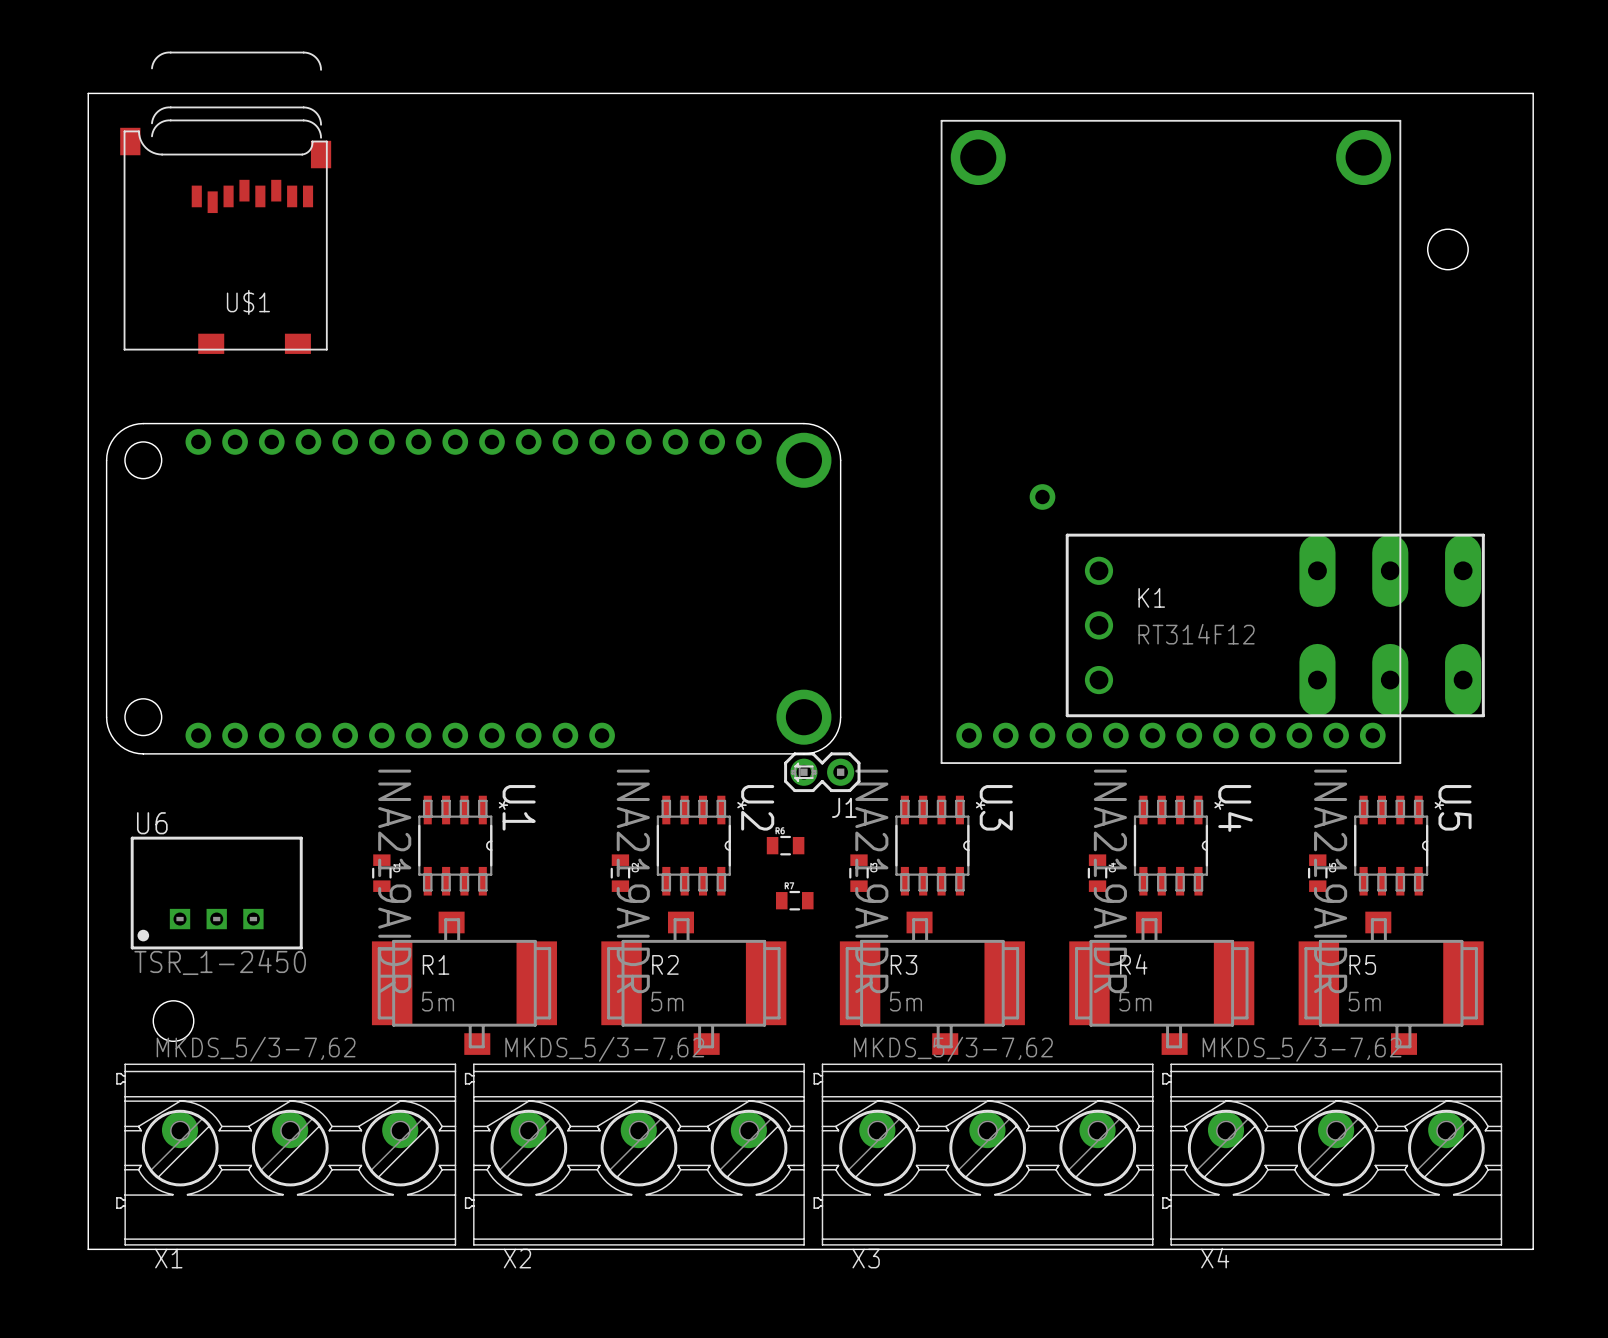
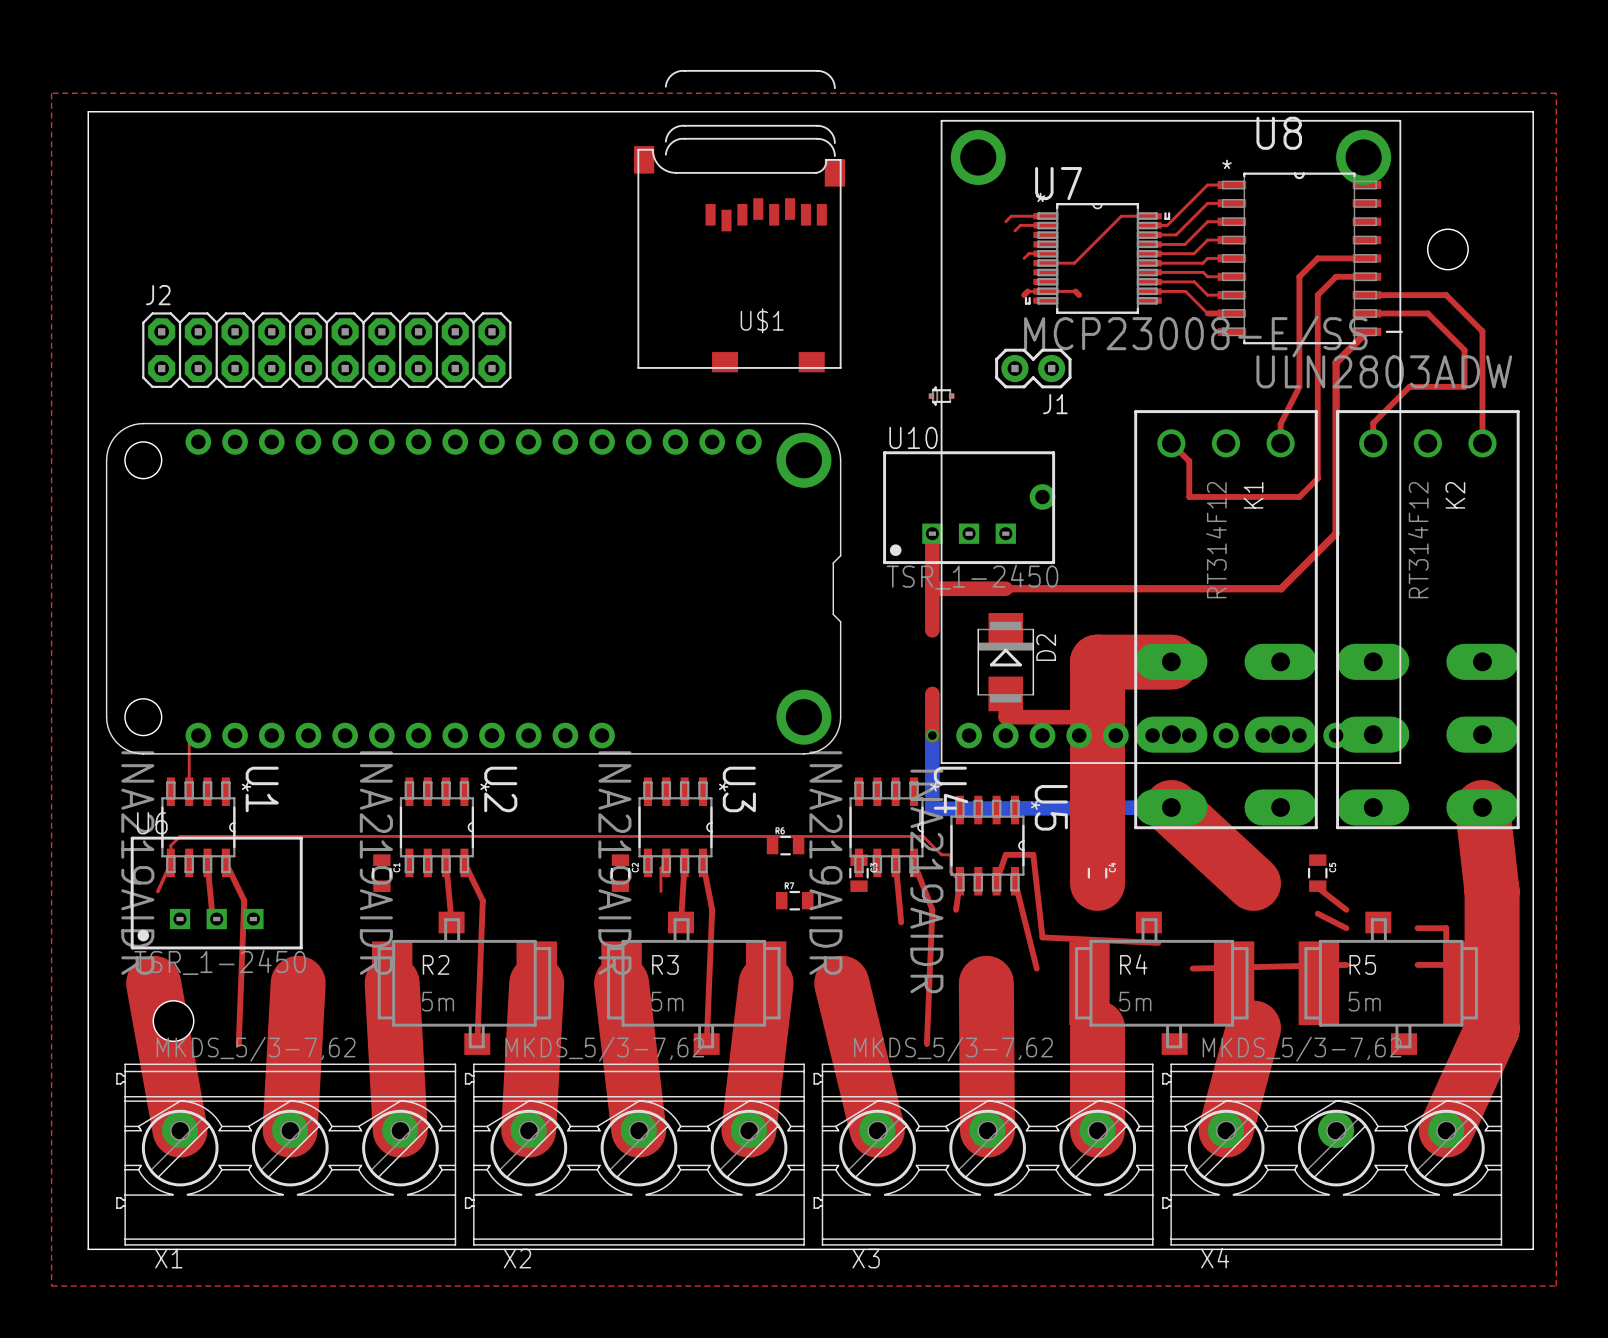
top zone outline: none -> (51, 93) (51, 1286) (1556, 1286) (1556, 93) (51, 93)
board edge: (88, 111) (88, 93) (1533, 93) (1533, 111) -> (88, 111) (1533, 111)
top track: none -> (1231, 185) (1207, 185) (1167, 225) (1149, 225)
U$1 position: (225, 202) -> (739, 221)
top track: none -> (1231, 203) (1207, 203) (1176, 234) (1149, 234)
top track: none -> (1045, 216) (1011, 216) (1005, 221)
top track: none -> (1149, 216) (1121, 216) (1074, 263) (1045, 263)
top track: none -> (1231, 221) (1207, 221) (1184, 244) (1149, 244)
top track: none -> (1045, 225) (1020, 225) (1014, 230)
top track: none -> (1231, 240) (1207, 240) (1194, 253) (1149, 253)
top track: none -> (1045, 253) (1028, 253) (1024, 258)
U7: none -> MCP23008-E/SS (1097, 258)
top track: none -> (1231, 258) (1207, 258) (1202, 263) (1149, 263)
U8: none -> ULN2803ADW (1310, 258)
top track: none -> (1366, 258) (1317, 258) (1299, 276) (1299, 386) (1280, 424) (1280, 443)
top track: none -> (1149, 272) (1203, 272) (1207, 276) (1231, 276)
top track: none -> (1366, 276) (1336, 276) (1317, 295) (1317, 478) (1299, 496) (1189, 496) (1189, 461) (1171, 443)
top track: none -> (1149, 281) (1194, 281) (1207, 295) (1231, 295)
top track: none -> (1149, 291) (1185, 291) (1207, 313) (1231, 313)
top track: none -> (1024, 295) (1027, 291) (1075, 291) (1079, 295)
top track: none -> (1366, 295) (1446, 295) (1482, 331) (1482, 443)
top track: none -> (1366, 313) (1427, 313) (1464, 350) (1464, 386) (1409, 386) (1373, 423) (1373, 443)
top track: none -> (1366, 331) (1336, 362) (1336, 533) (1281, 588) (932, 588)
J2: none -> (326, 350)
part: none -> (941, 396)
part footprint: [106, 423, 841, 754] -> [106, 423, 841, 754]
U10: none -> TSR_1-2450 (969, 507)
top track: none -> (932, 533) (932, 630)
K2: none -> RT314F12 (1427, 619)
K1 rotation: 0° (1275, 625) -> 90° clockwise (1226, 619)
D2: none -> (1005, 662)
top track: none -> (1171, 662) (1097, 662) (1097, 883)
top track: none -> (932, 693) (932, 735)
top track: none -> (1005, 693) (1005, 717) (1097, 717)
top track: none -> (198, 735) (189, 744) (189, 791)
bottom track: none -> (932, 735) (932, 808) (1171, 807)
via: none -> (932, 735)
part: (803, 772) -> none
J1 position: (822, 772) -> (1033, 368)
top track: none -> (1171, 807) (1253, 883)
top track: none -> (1482, 807) (1492, 891) (1492, 1029) (1446, 1130)
U1 position: (455, 845) -> (198, 827)
U2 position: (693, 845) -> (436, 827)
U3 position: (932, 845) -> (675, 827)
U4 position: (1170, 845) -> (886, 827)
U5 position: (1391, 845) -> (987, 845)
top track: none -> (207, 862) (213, 922)
top track: none -> (225, 862) (244, 900) (238, 1044)
top track: none -> (446, 862) (451, 922)
top track: none -> (464, 862) (482, 900) (477, 1044)
top track: none -> (666, 862) (660, 868) (660, 891)
top track: none -> (684, 862) (680, 922)
top track: none -> (703, 862) (712, 909) (706, 1044)
top track: none -> (895, 862) (901, 922)
top track: none -> (914, 862) (932, 909) (926, 1044)
top track: none -> (996, 881) (1005, 854) (1033, 854) (1042, 937) (1158, 942)
top track: none -> (1014, 881) (1036, 968)
top track: none -> (1317, 887) (1346, 909)
top track: none -> (157, 891) (170, 862) (170, 845) (180, 836) (923, 836) (941, 854) (950, 854) (950, 872) (959, 881) (956, 909)
top track: none -> (1317, 913) (1346, 928)
top track: none -> (1417, 928) (1446, 928) (1446, 964) (1417, 964)
R1 name: R1 (436, 964) -> R2 (436, 964)
R2 name: R2 (665, 964) -> R3 (665, 964)
top track: none -> (1346, 964) (1192, 968)
top track: none -> (153, 983) (180, 1130)
top track: none -> (298, 983) (290, 1130)
top track: none -> (392, 983) (400, 1130)
top track: none -> (536, 983) (528, 1130)
top track: none -> (621, 983) (638, 1130)
top track: none -> (766, 983) (748, 1130)
top track: none -> (841, 983) (877, 1130)
R3: 5m (932, 983) -> none
top track: none -> (986, 983) (987, 1130)
top track: none -> (1097, 1028) (1097, 1130)
top track: none -> (1253, 1028) (1226, 1130)

